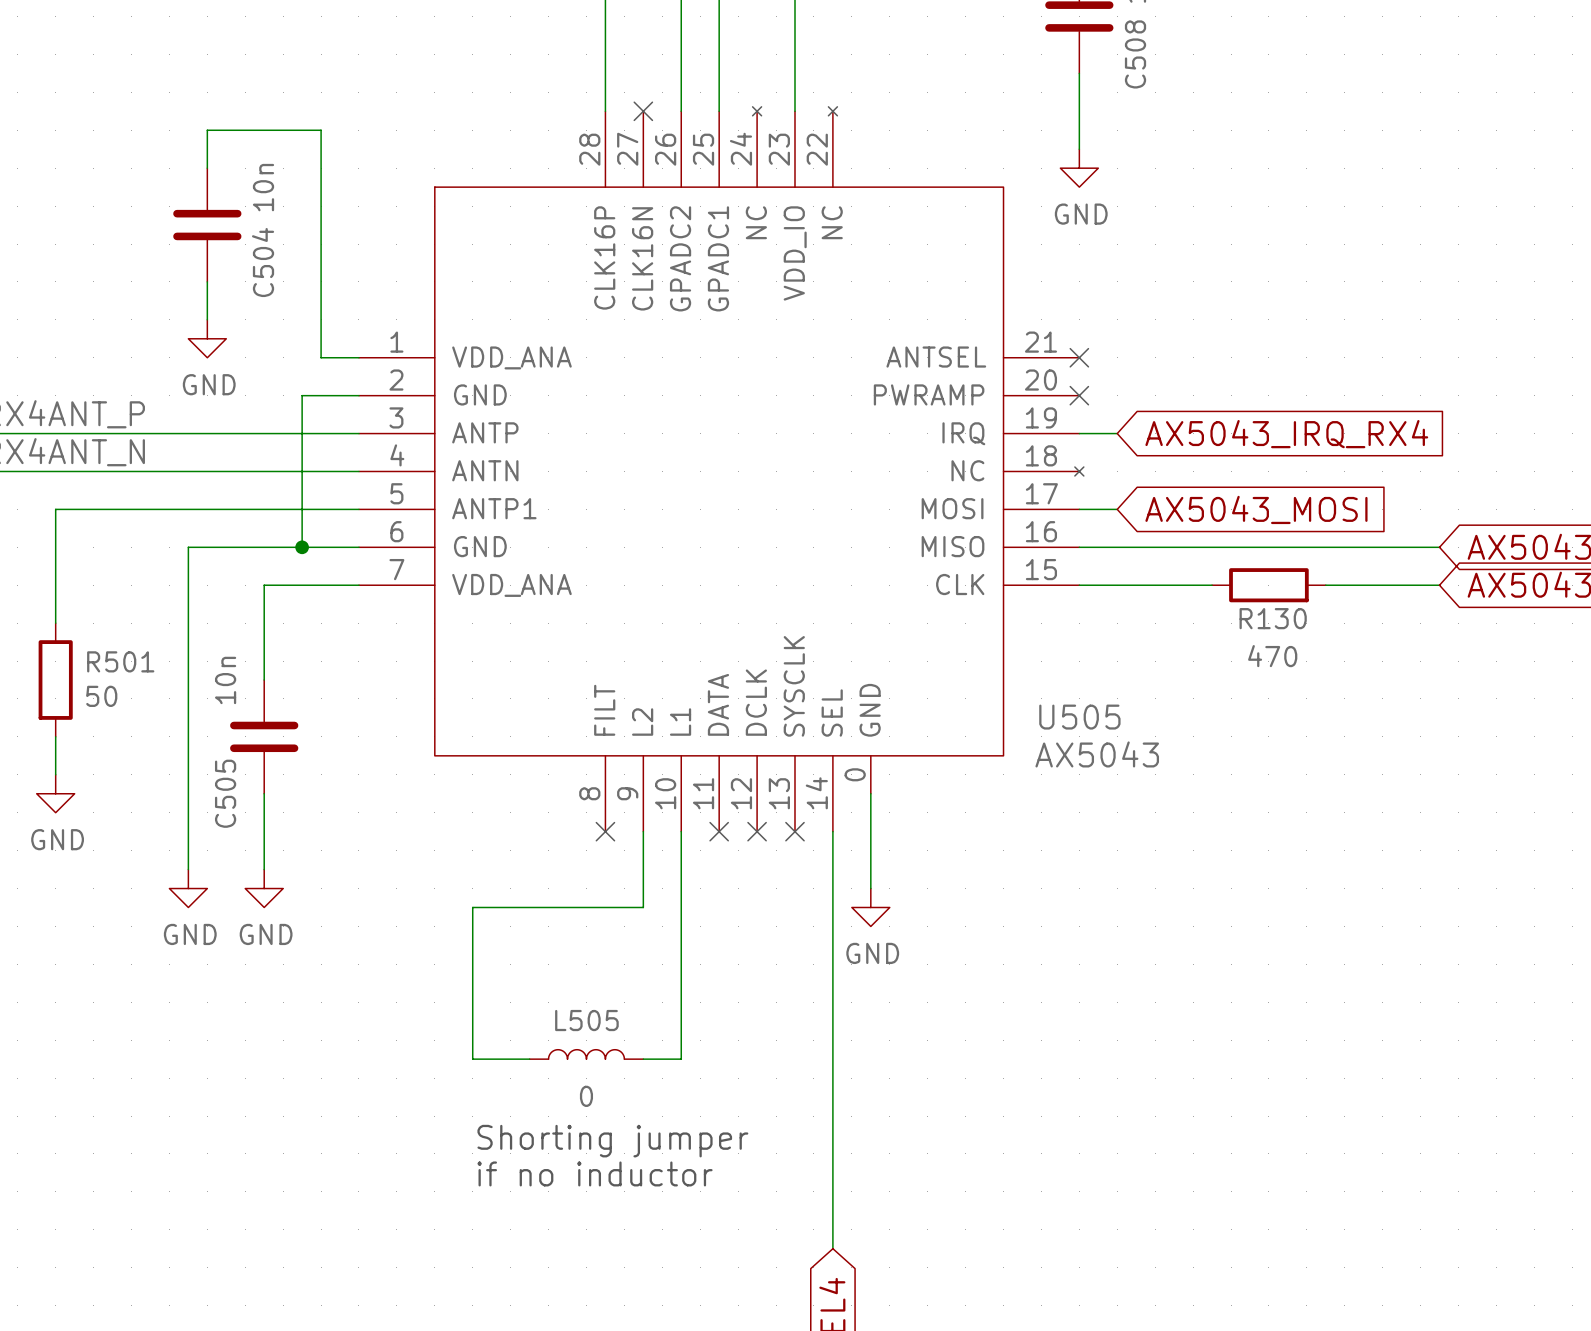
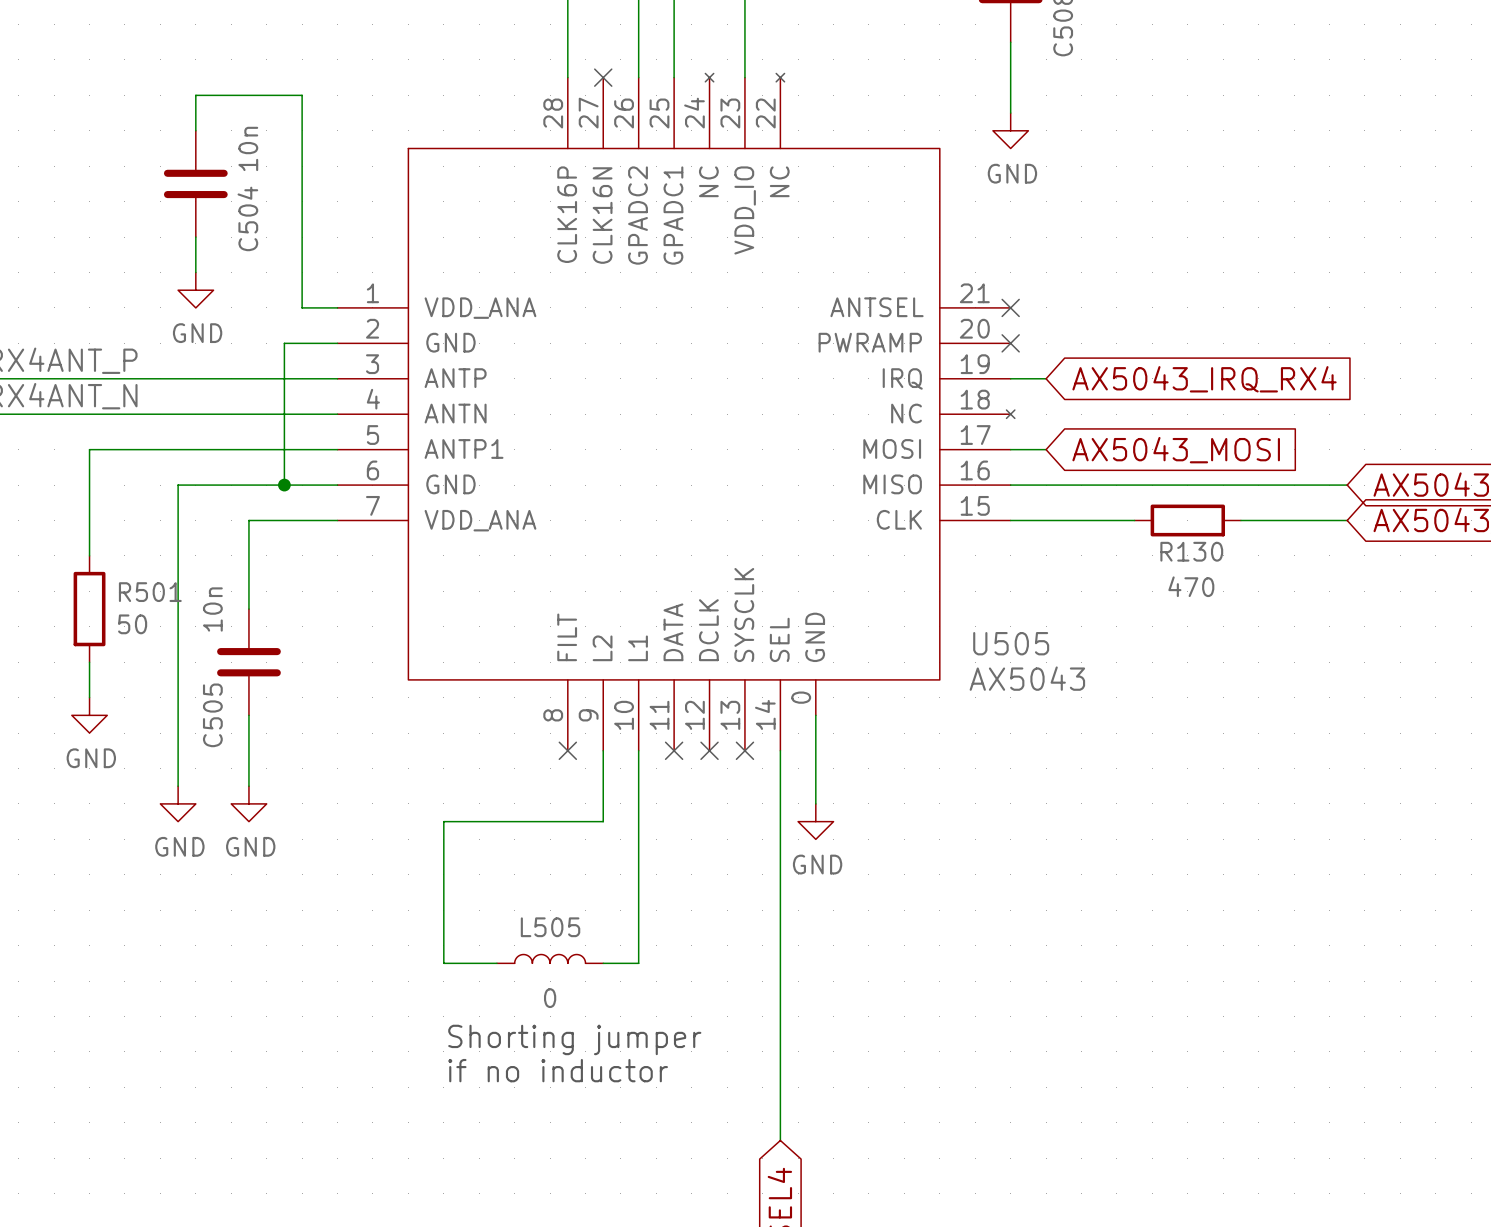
wire: (93, 509) (55, 509) (55, 623) -> (89, 449) (89, 555)
R501 position: (55, 680) -> (89, 609)
wire: (55, 736) (55, 774) -> (89, 662) (89, 697)
power symbol position: GND (55, 793) -> GND (89, 715)

